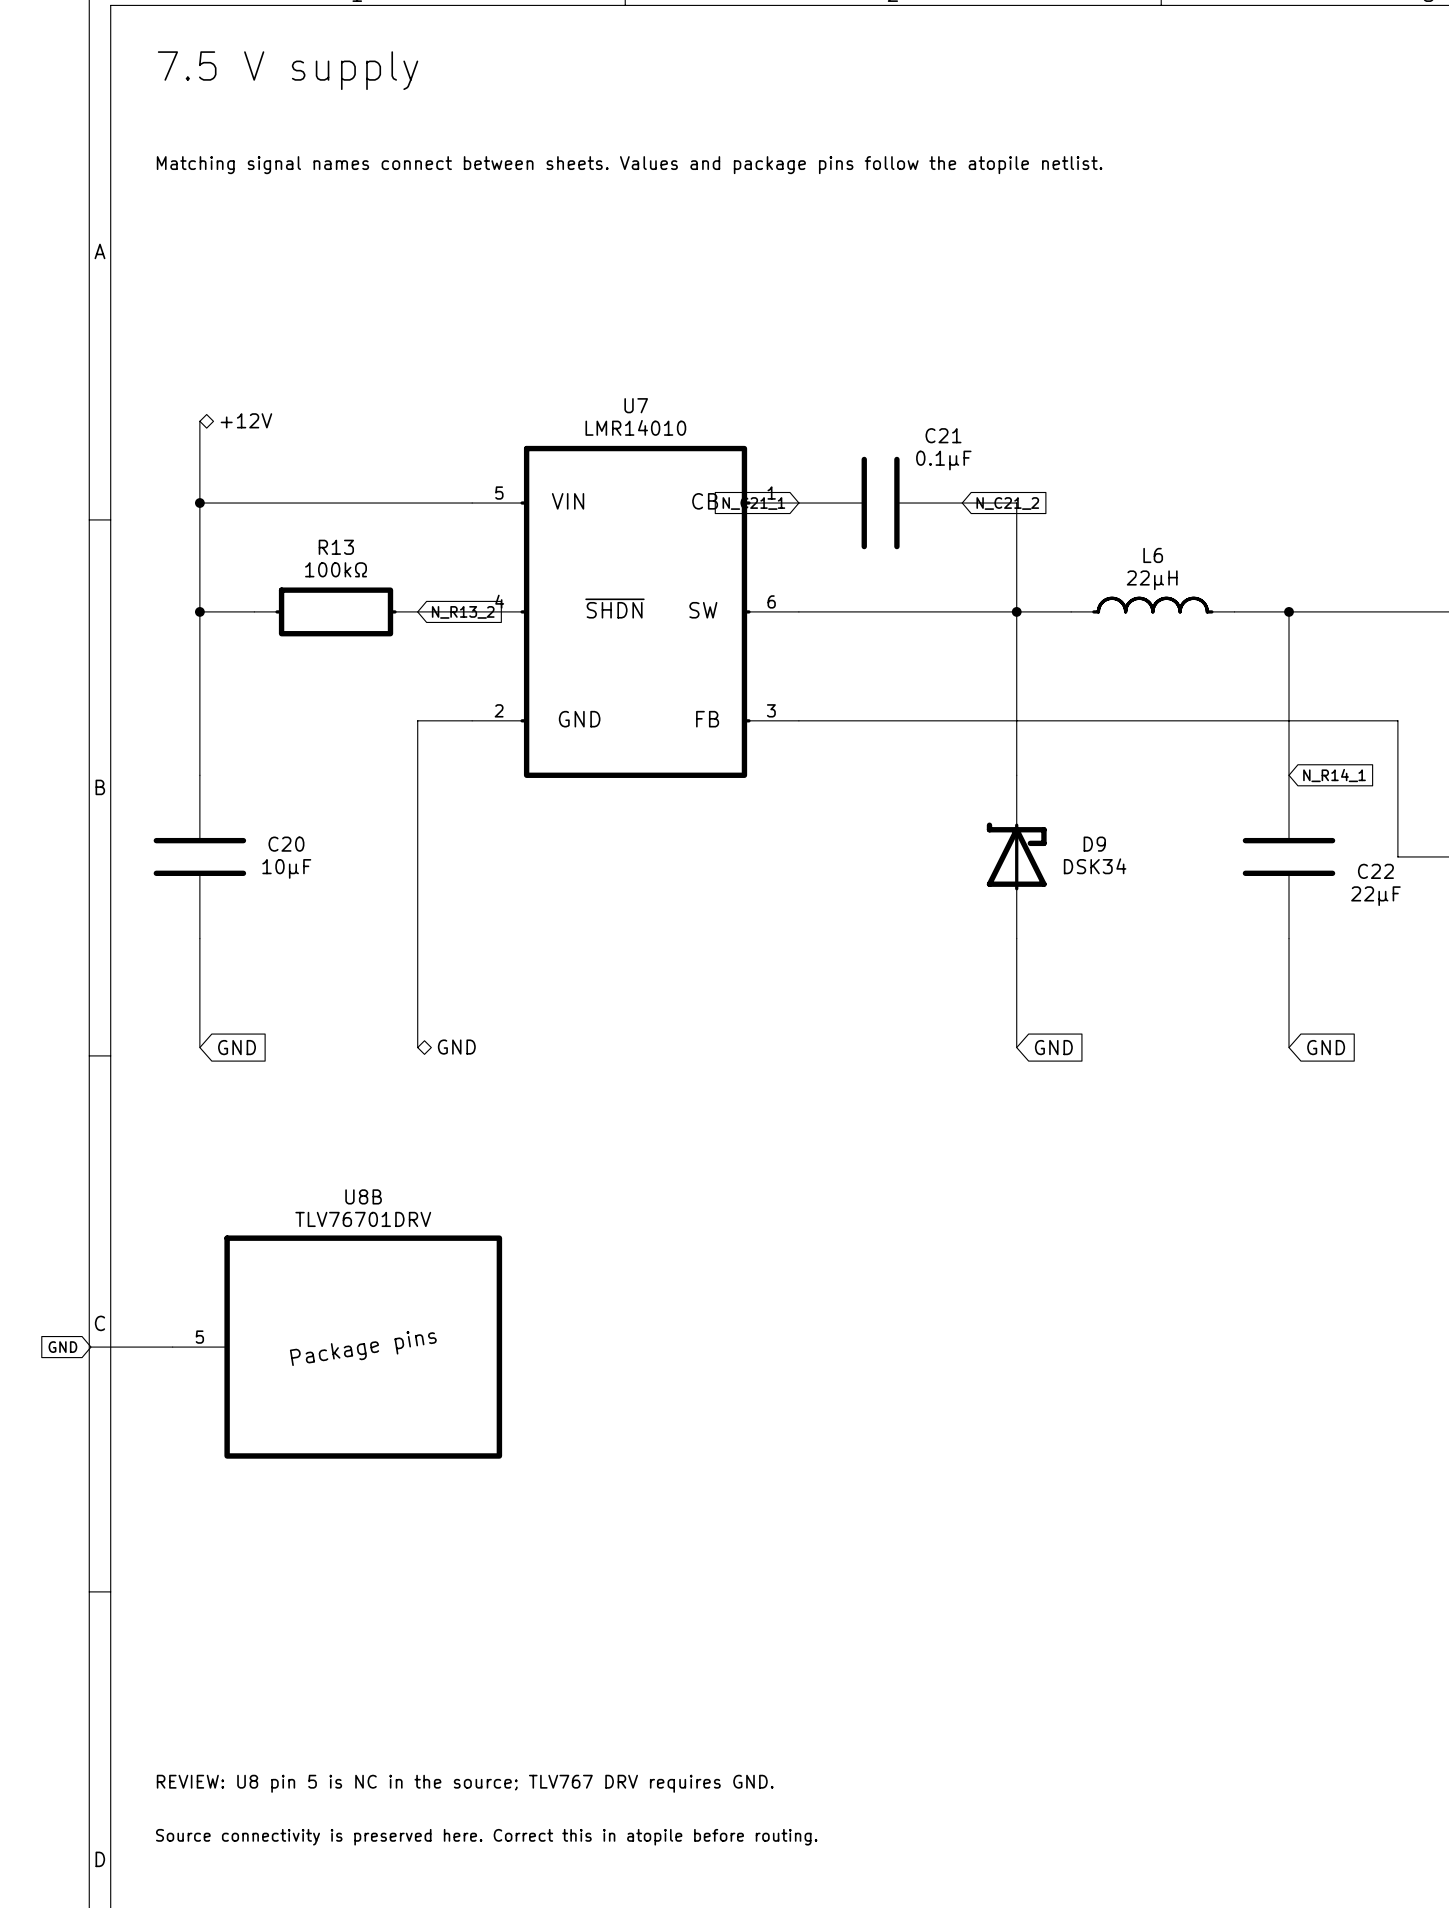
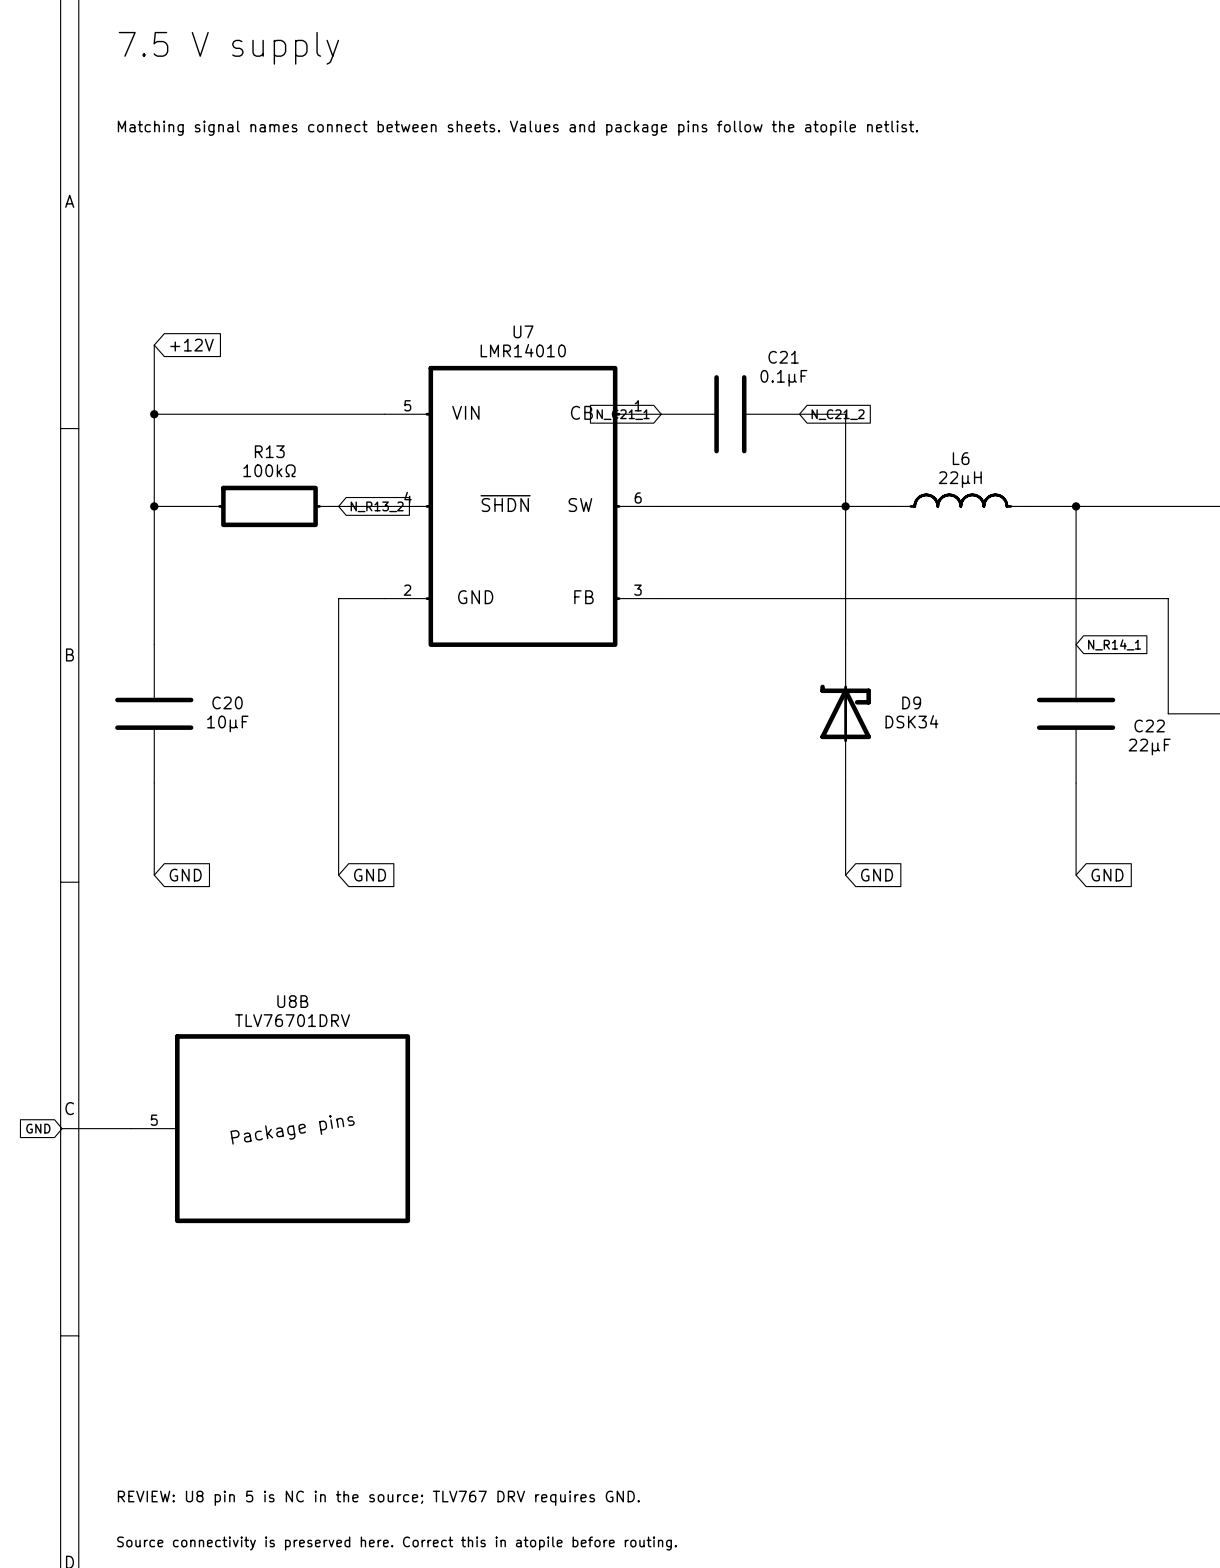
hierarchical label: +12V (246, 420) -> none
global label: none -> +12V (192, 345)
global label: none -> GND (370, 875)
hierarchical label: GND (456, 1047) -> none

